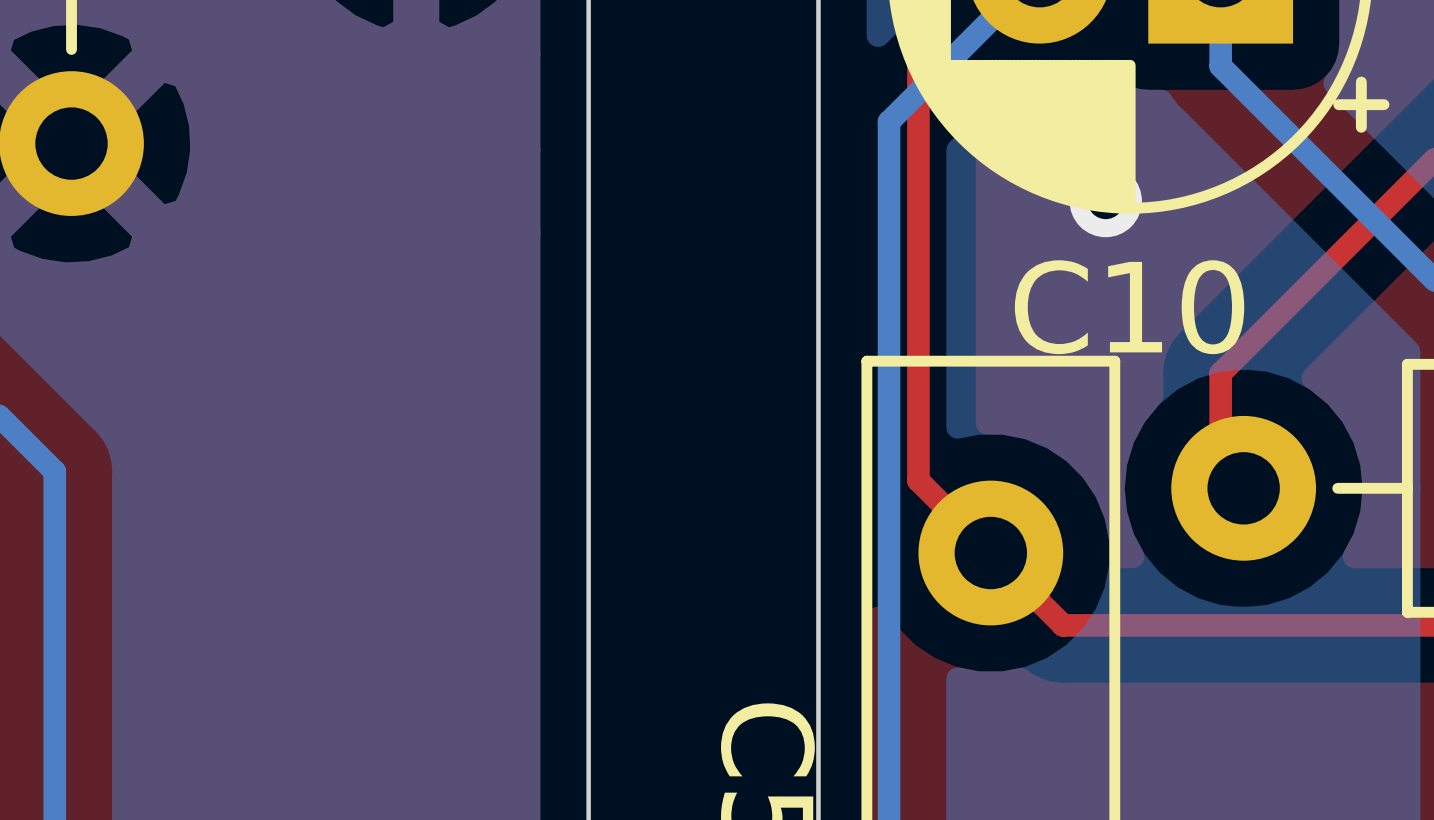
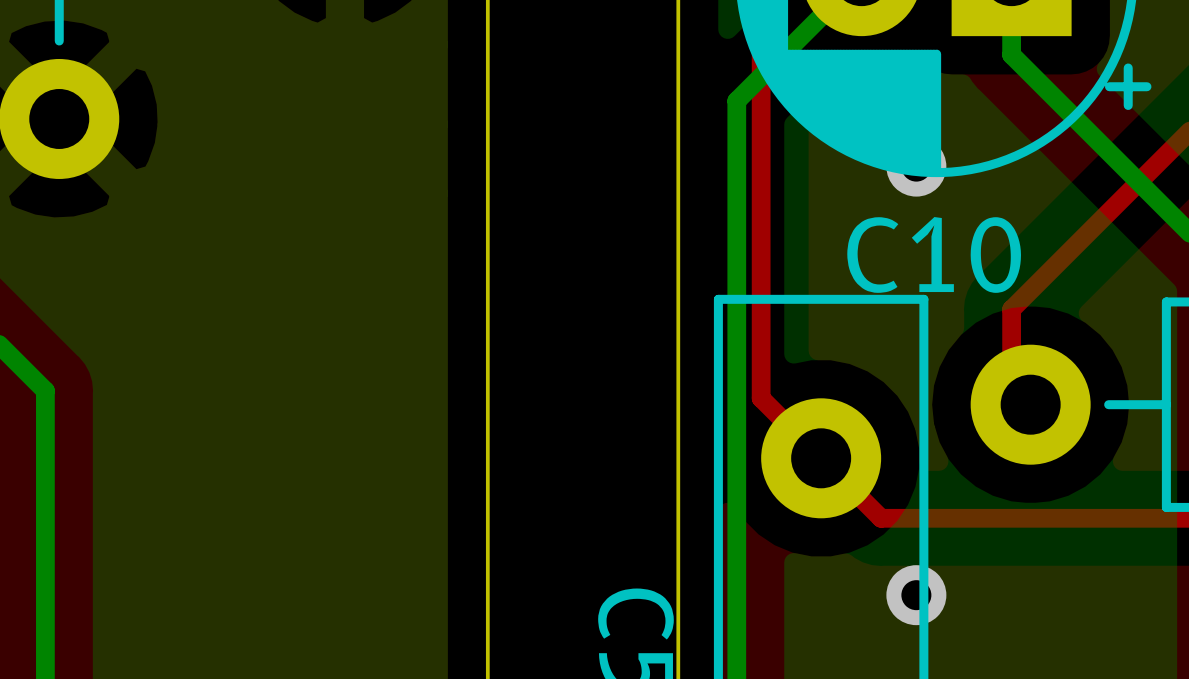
via: none -> (916, 595)

